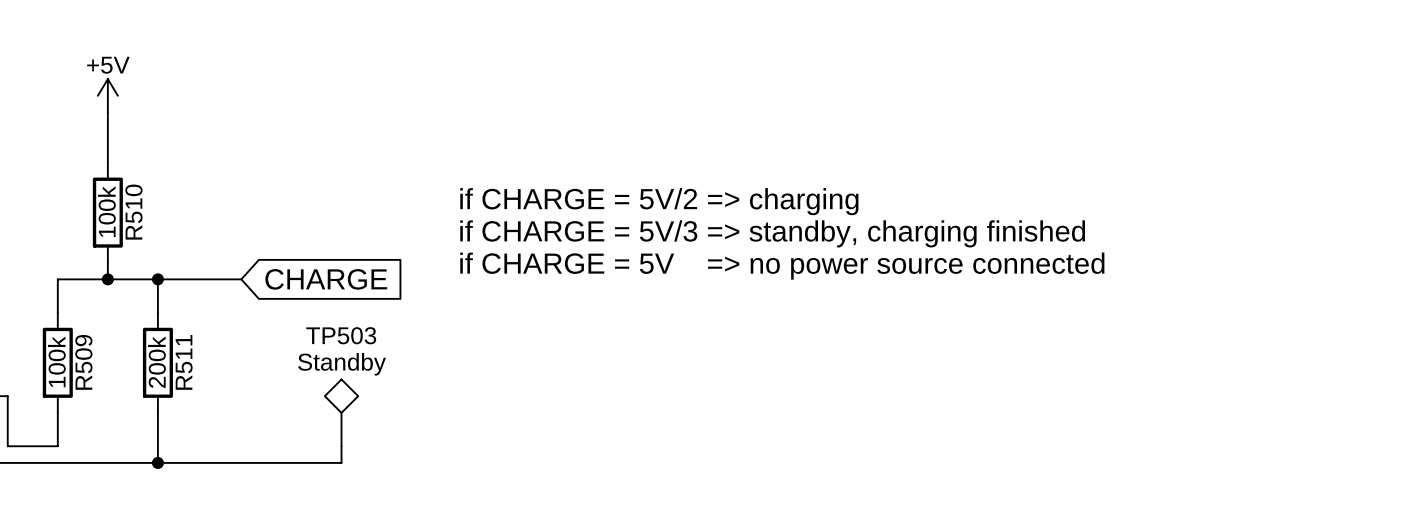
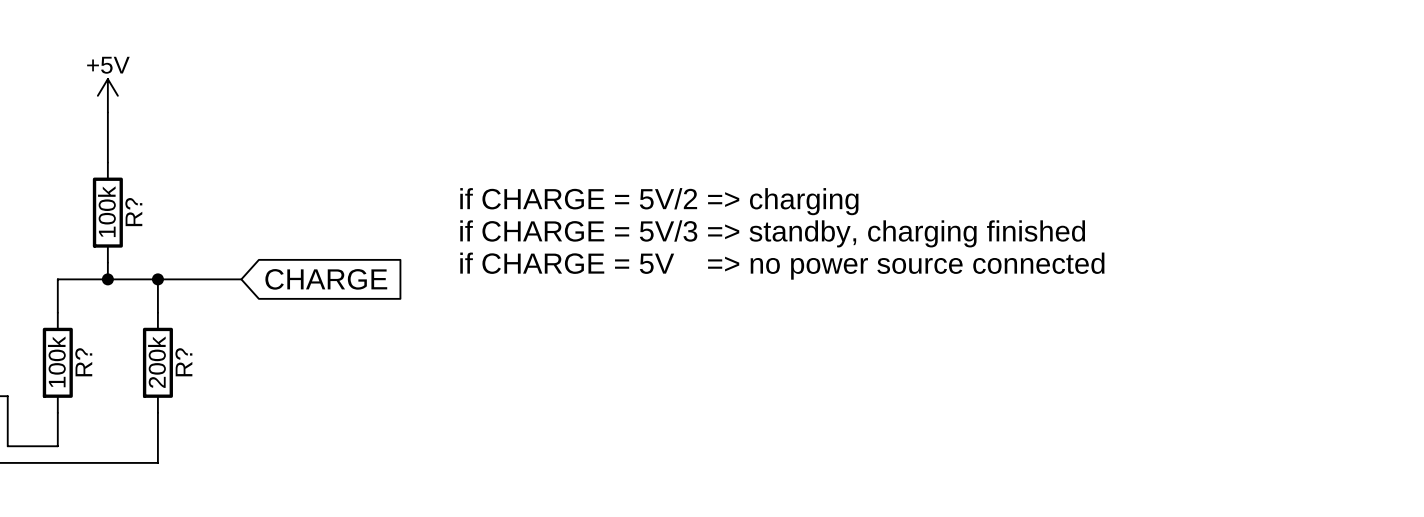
R510 name: R510 (133, 212) -> R? (133, 212)
R509 name: R509 (83, 362) -> R? (83, 362)
R511 name: R511 (184, 362) -> R? (183, 362)
TP503: Standby (341, 412) -> none
wire: (341, 446) (341, 462) (157, 462) -> none
junction: (157, 462) -> none

